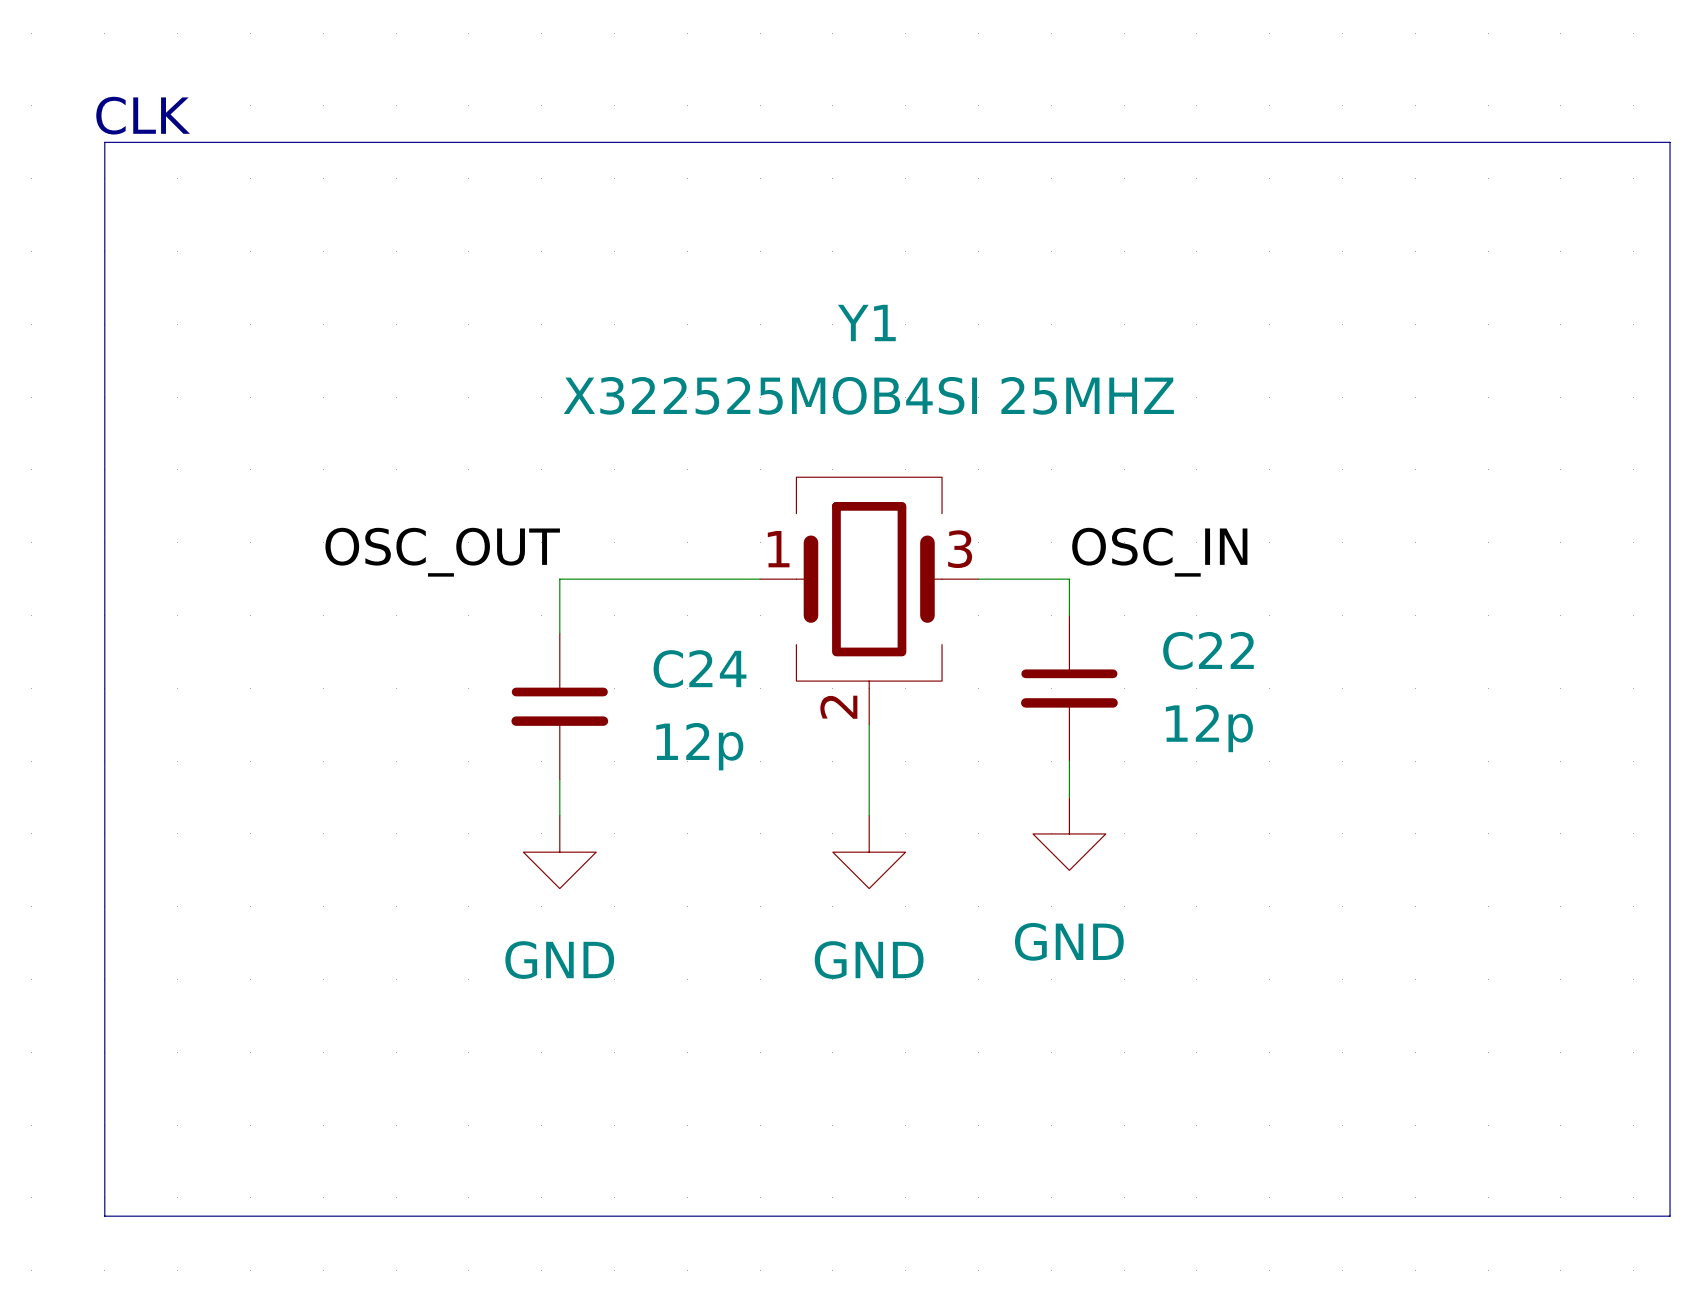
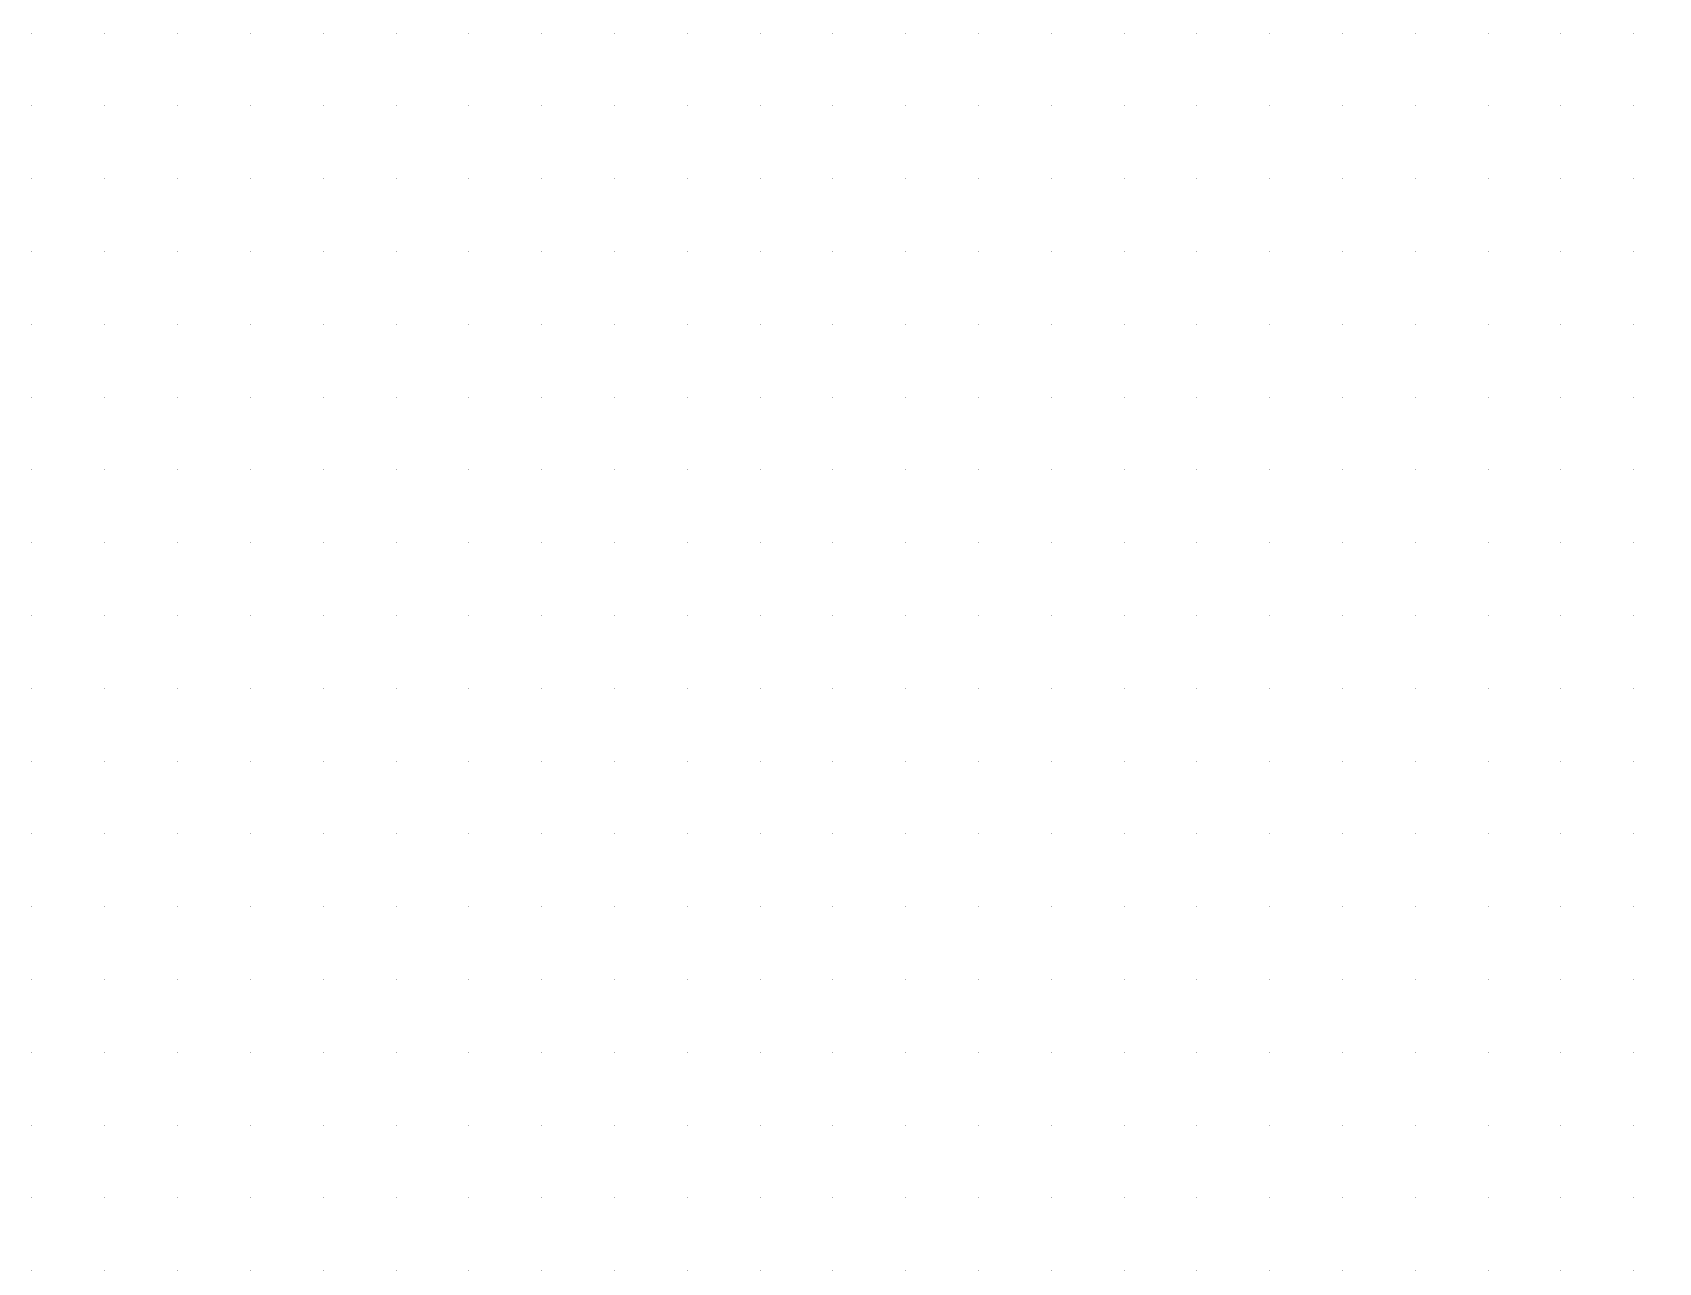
text: CLK (143, 115) -> none
line: (104, 142) (1670, 142) (1670, 1216) (104, 1216) (104, 142) -> none
label: OSC_OUT (442, 552) -> none
label: OSC_IN (1159, 552) -> none
wire: (760, 579) (559, 579) (559, 633) -> none
wire: (978, 579) (1069, 579) (1069, 615) -> none
Y1: X322525MOB4SI 25MHZ (869, 601) -> none
C22: 12p (1069, 688) -> none
C24: 12p (559, 706) -> none
wire: (869, 724) (869, 815) -> none
wire: (1069, 761) (1069, 797) -> none
wire: (559, 779) (559, 815) -> none
power symbol: GND (1069, 833) -> none
power symbol: GND (559, 852) -> none
power symbol: GND (869, 852) -> none

